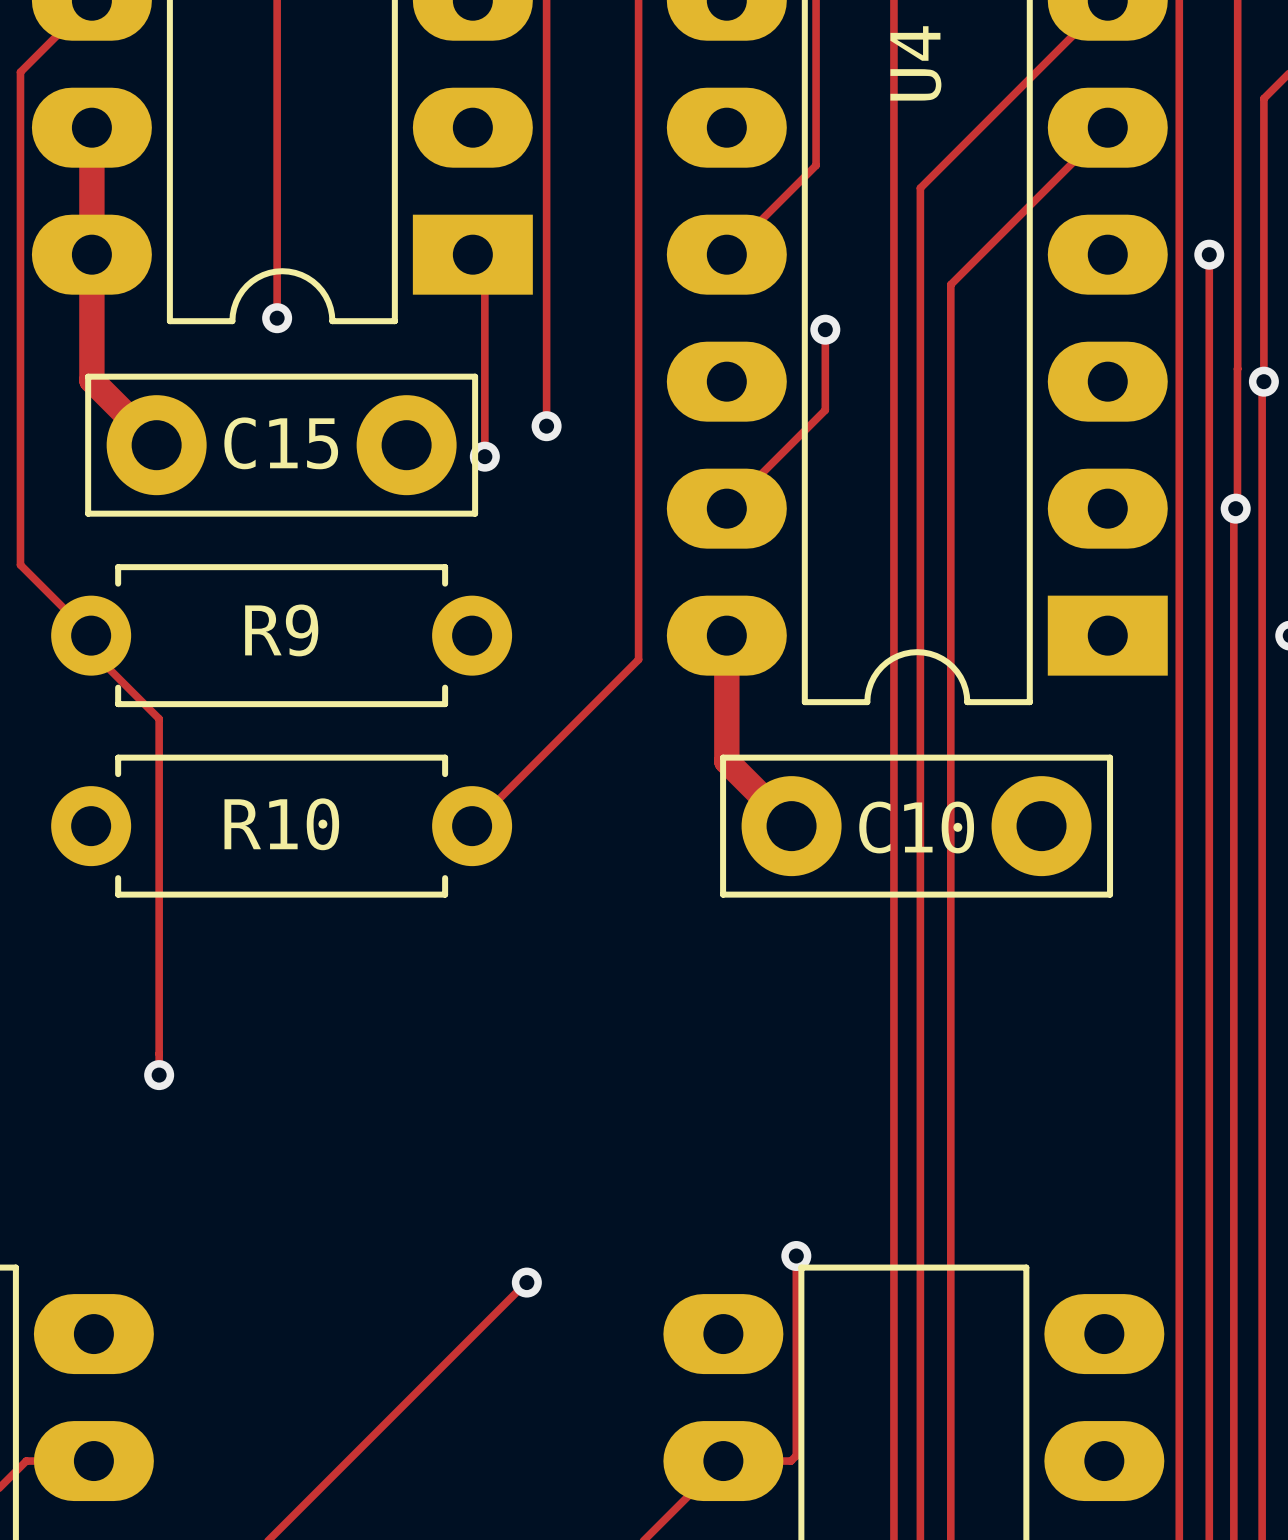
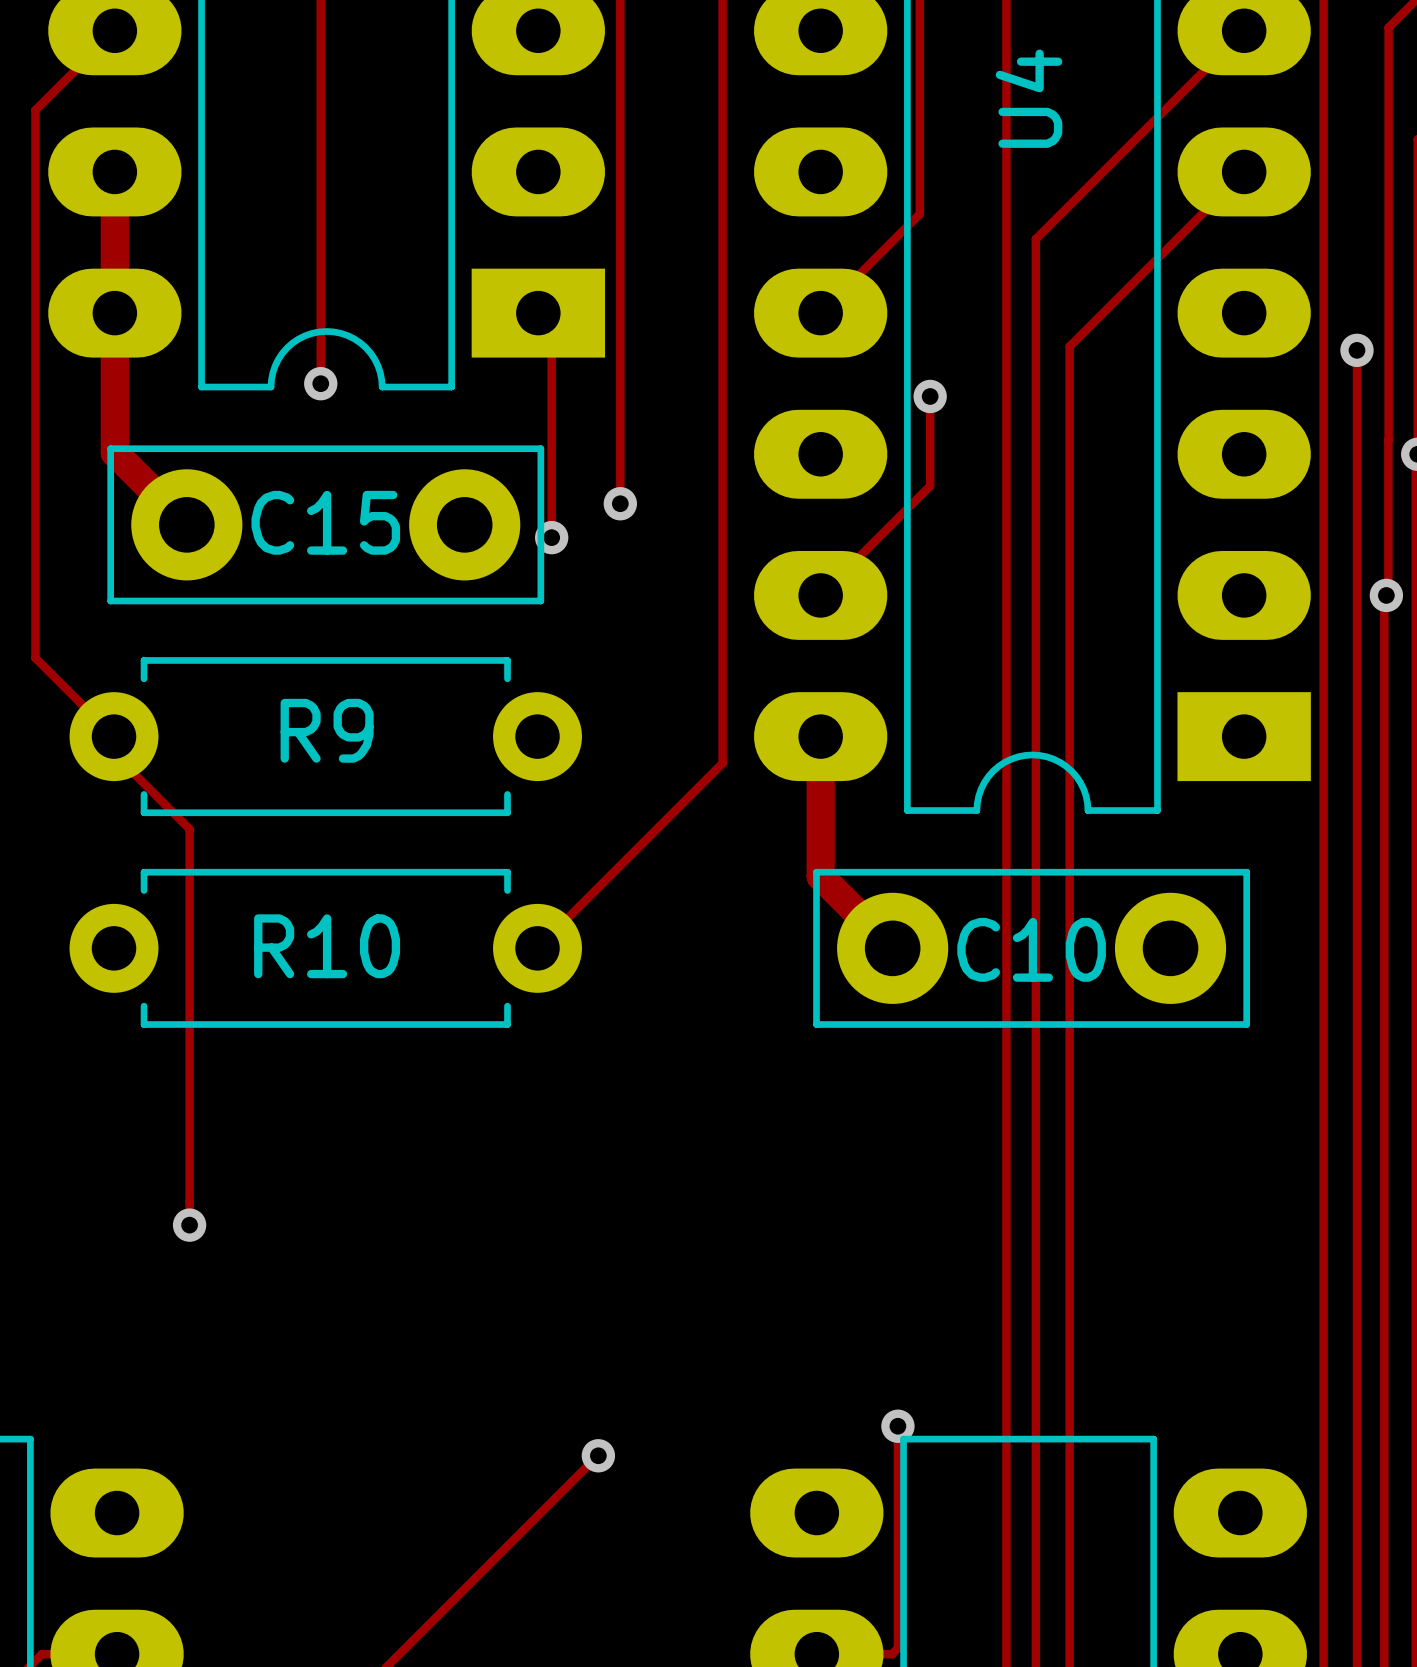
track: (1209, 254) (1209, 288) -> none
via position: (1209, 254) -> (1356, 350)

